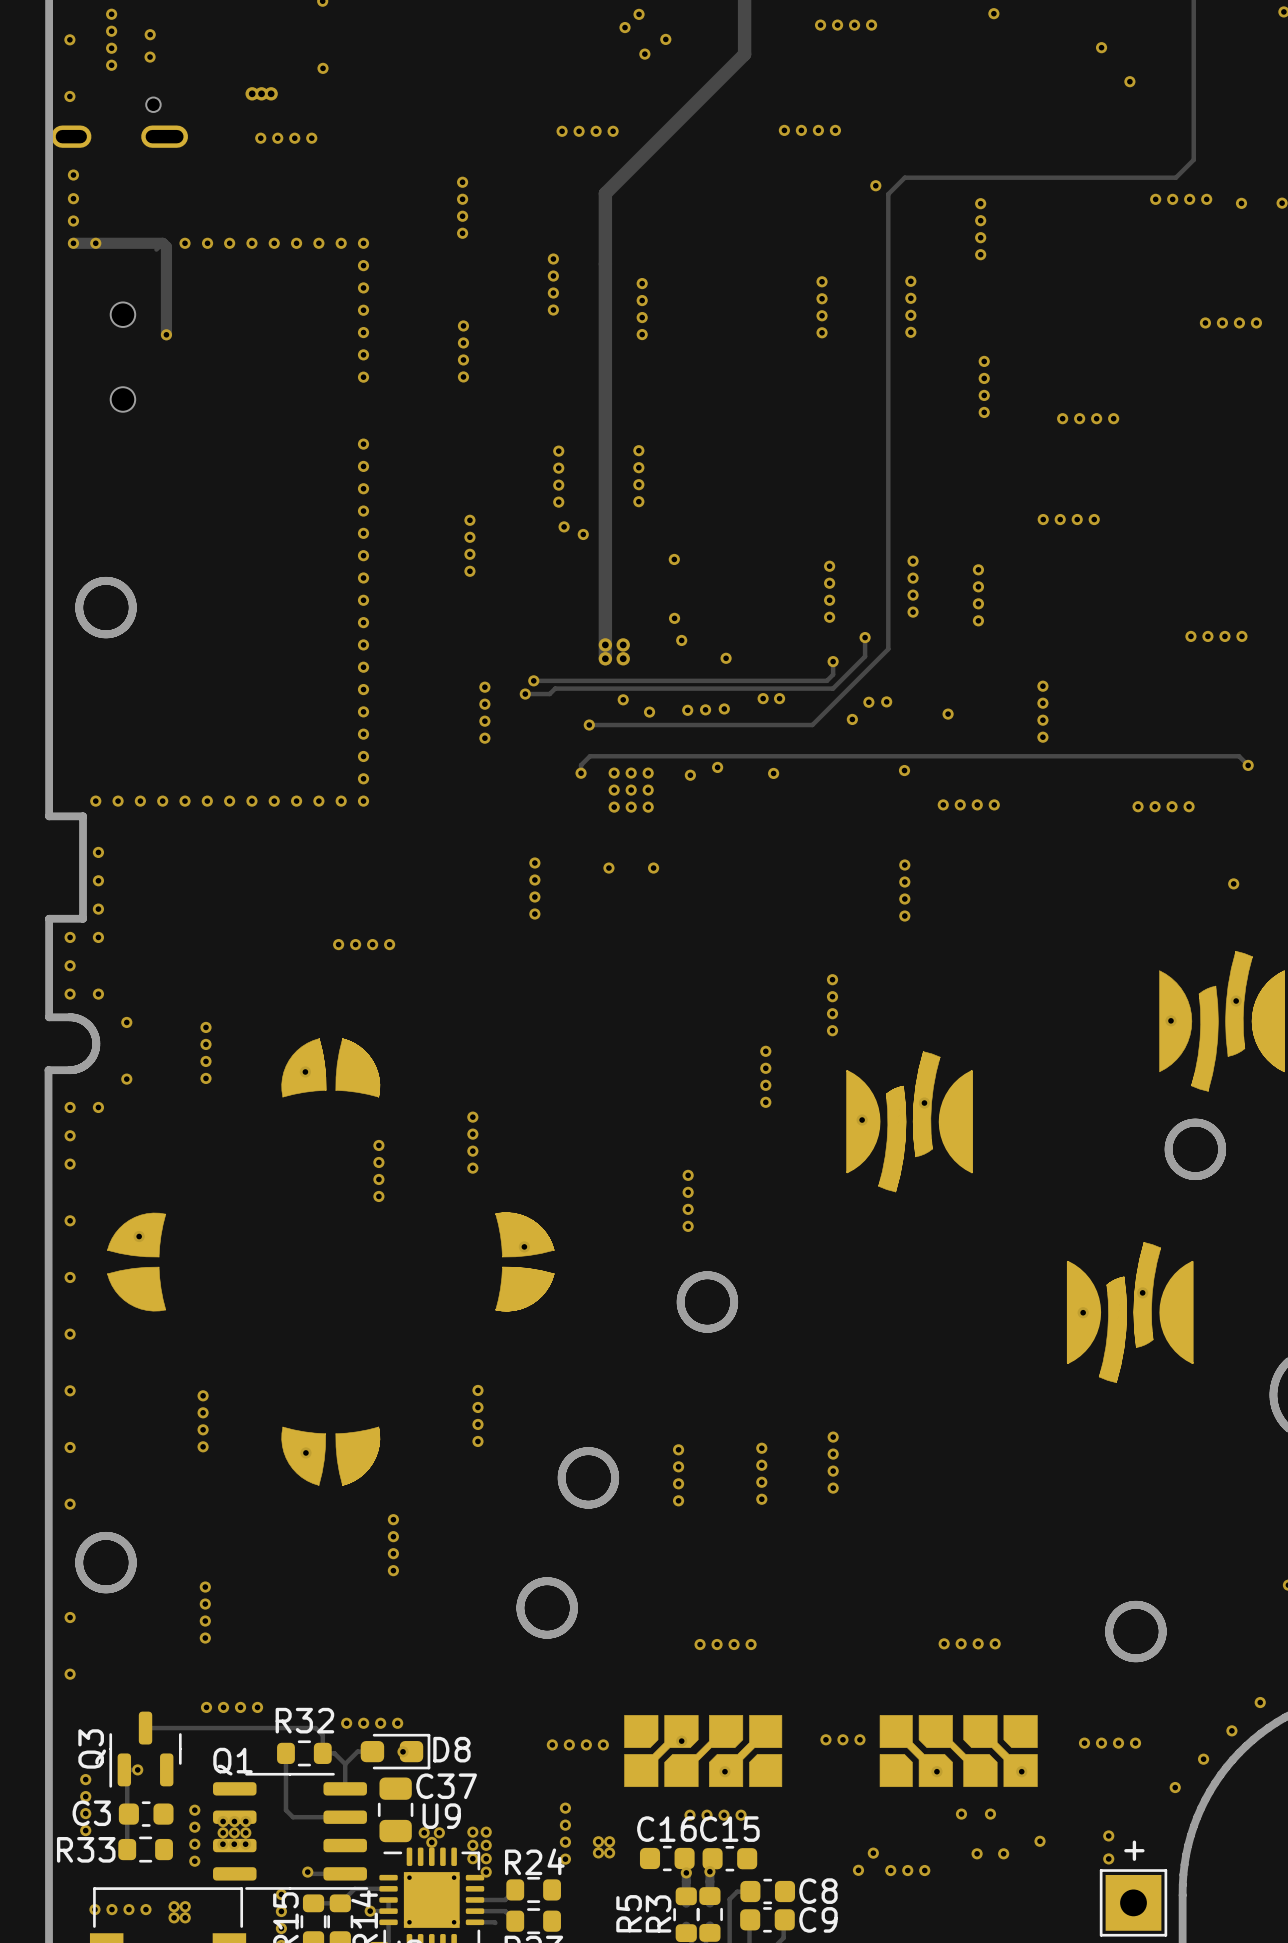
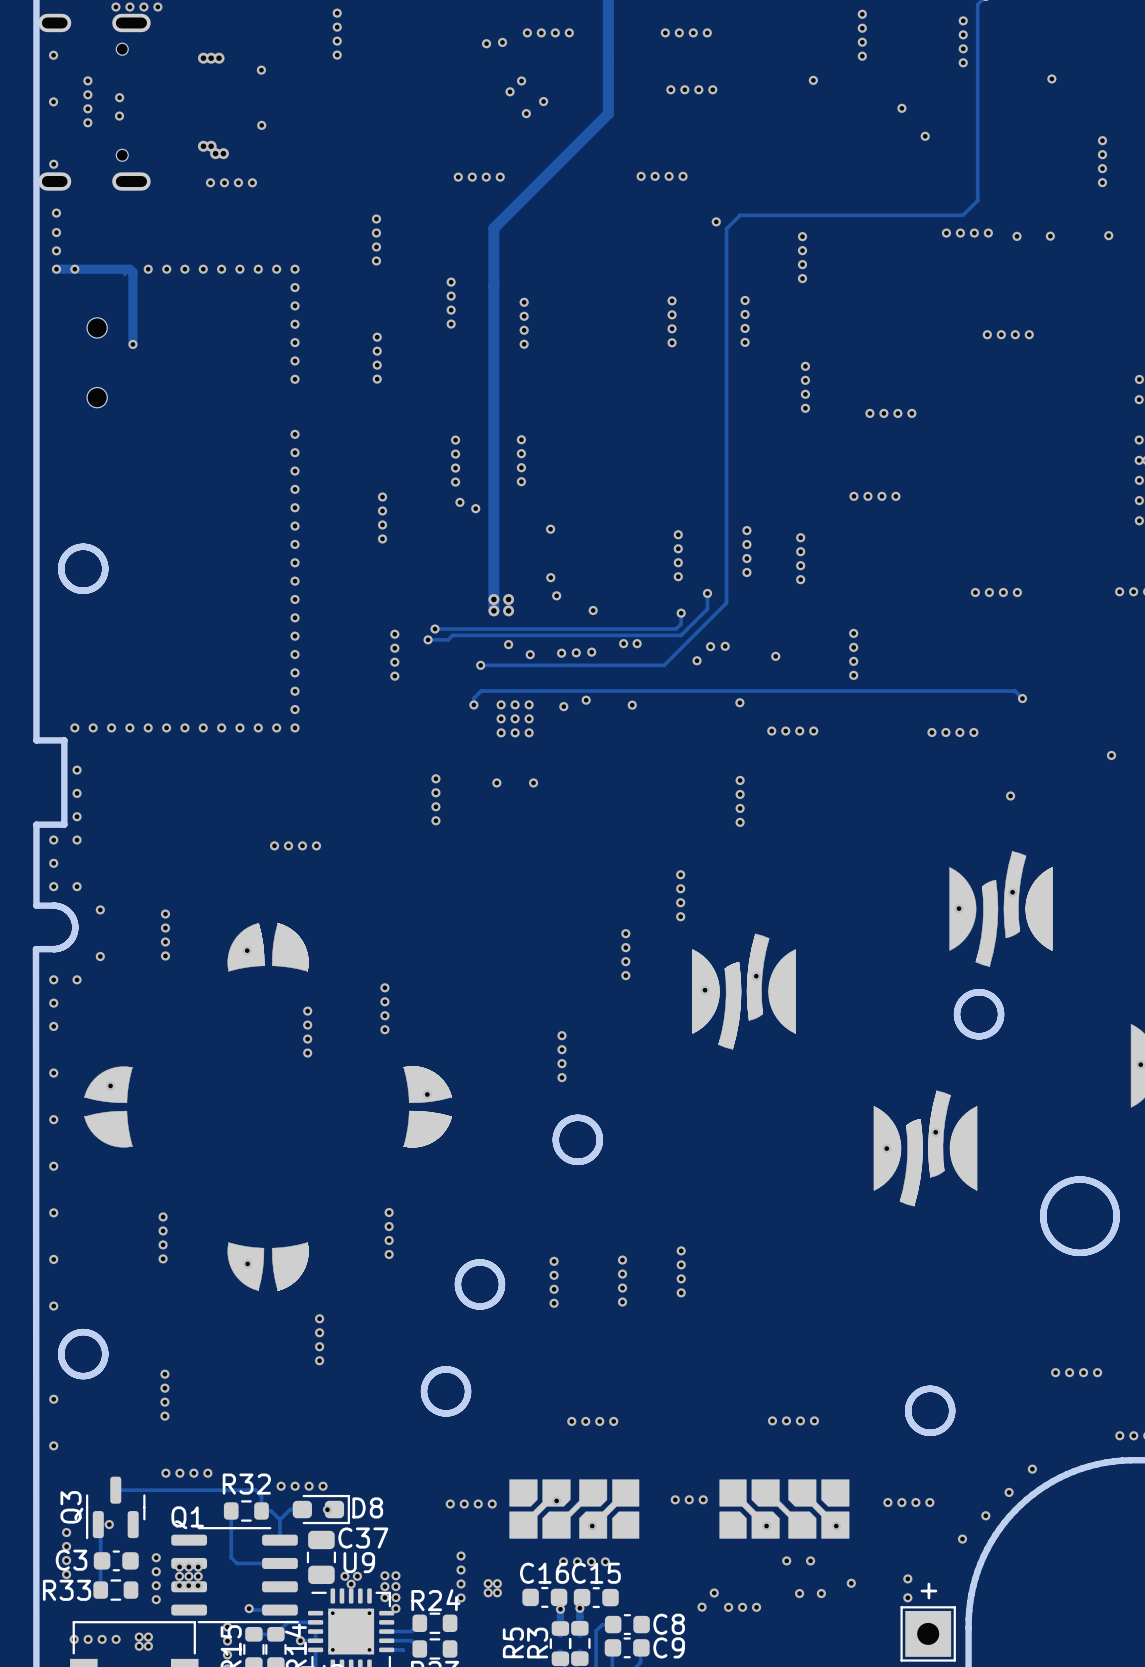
via: (271, 93) -> none
via position: (69, 96) -> (53, 164)
via: none -> (215, 153)
via: none -> (223, 153)

